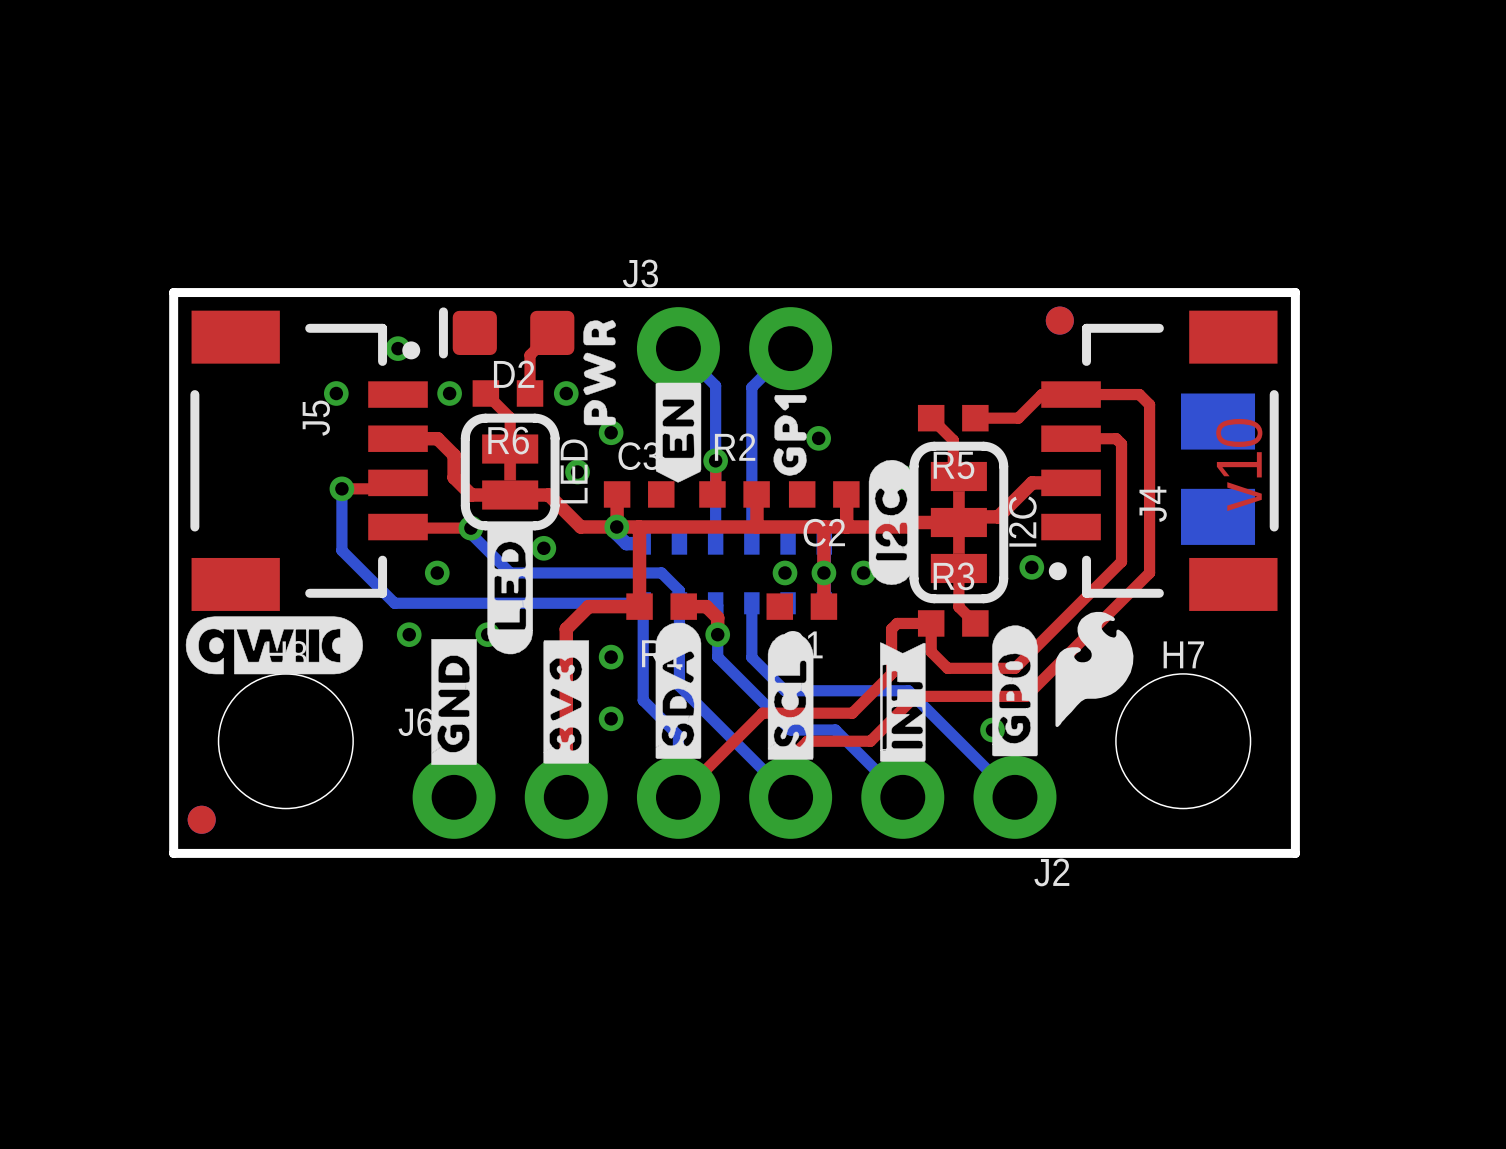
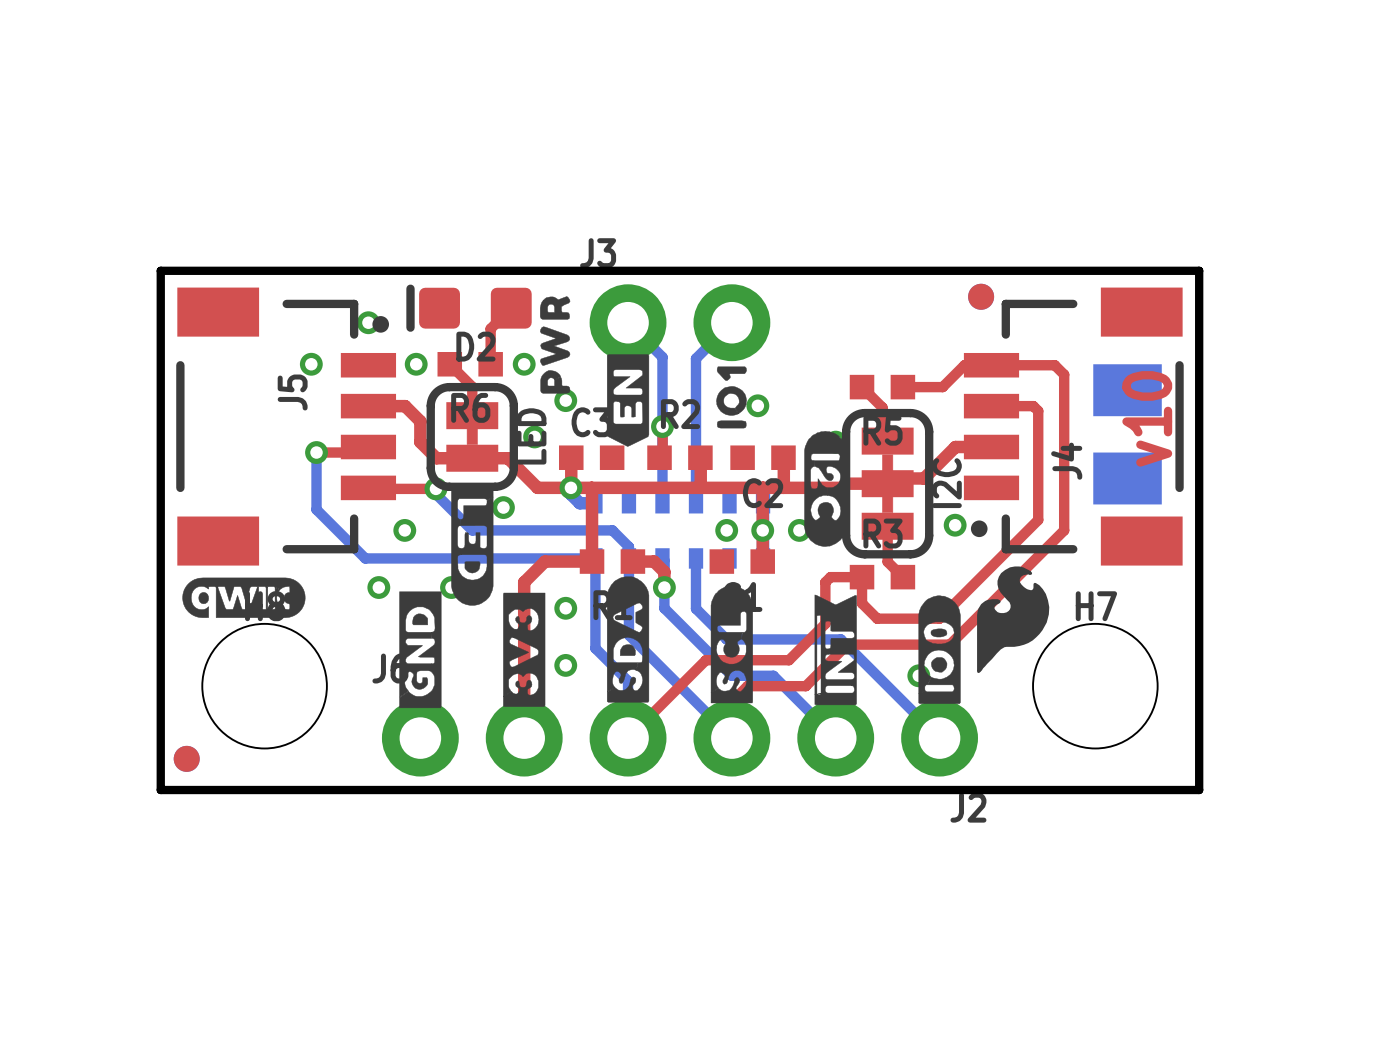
drawing shape: [773, 394, 807, 476] -> [716, 366, 747, 429]
drawing shape: [868, 460, 915, 585] -> [804, 431, 847, 547]
drawing shape: [487, 525, 533, 655] -> [451, 486, 494, 606]
drawing shape: [185, 616, 363, 675] -> [182, 577, 306, 618]
drawing shape: [992, 625, 1038, 757] -> [918, 595, 961, 704]

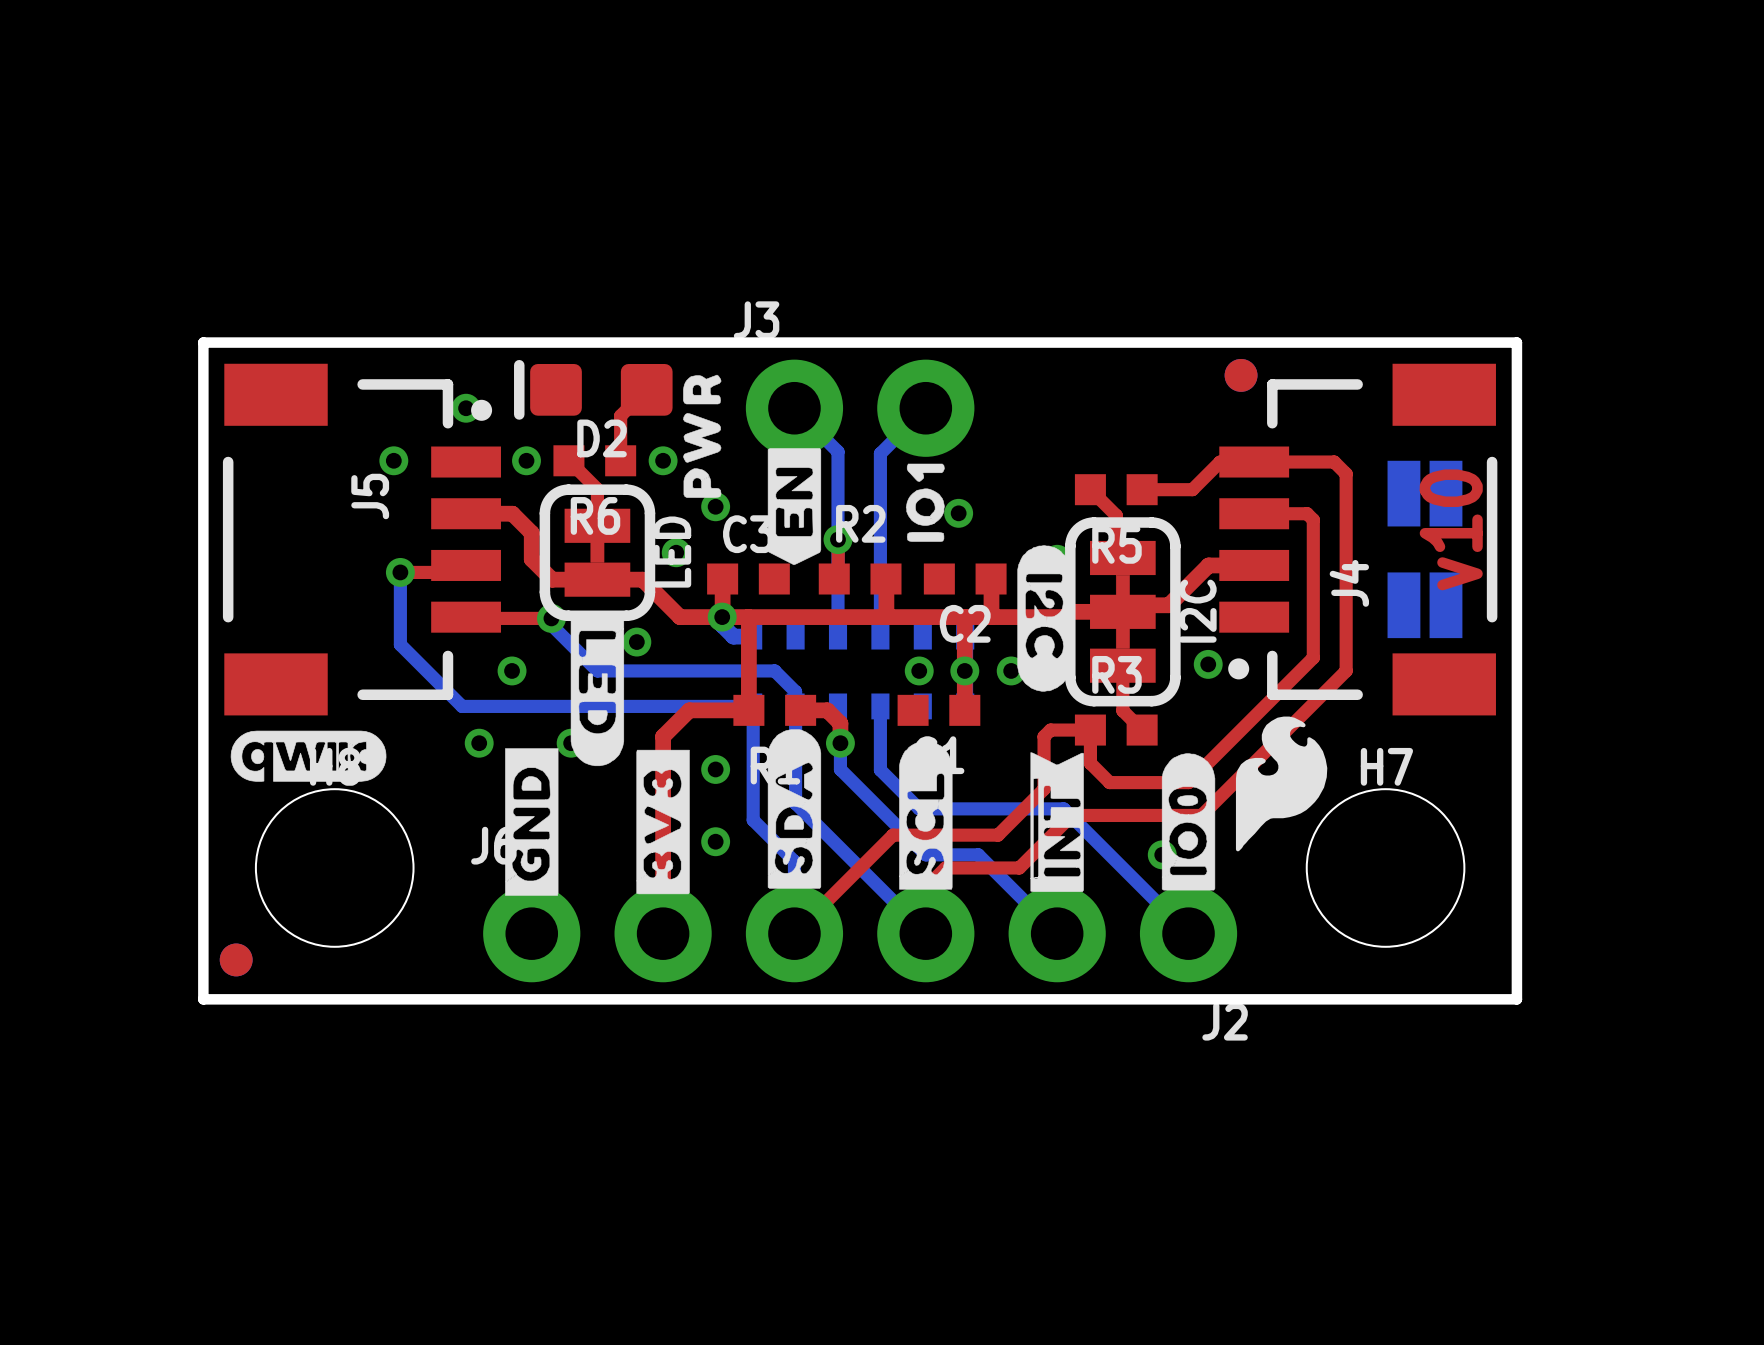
part footprint: [1093, 364, 1162, 417] -> [1387, 460, 1463, 527]
part footprint: [1093, 452, 1162, 505] -> [1387, 572, 1463, 639]

